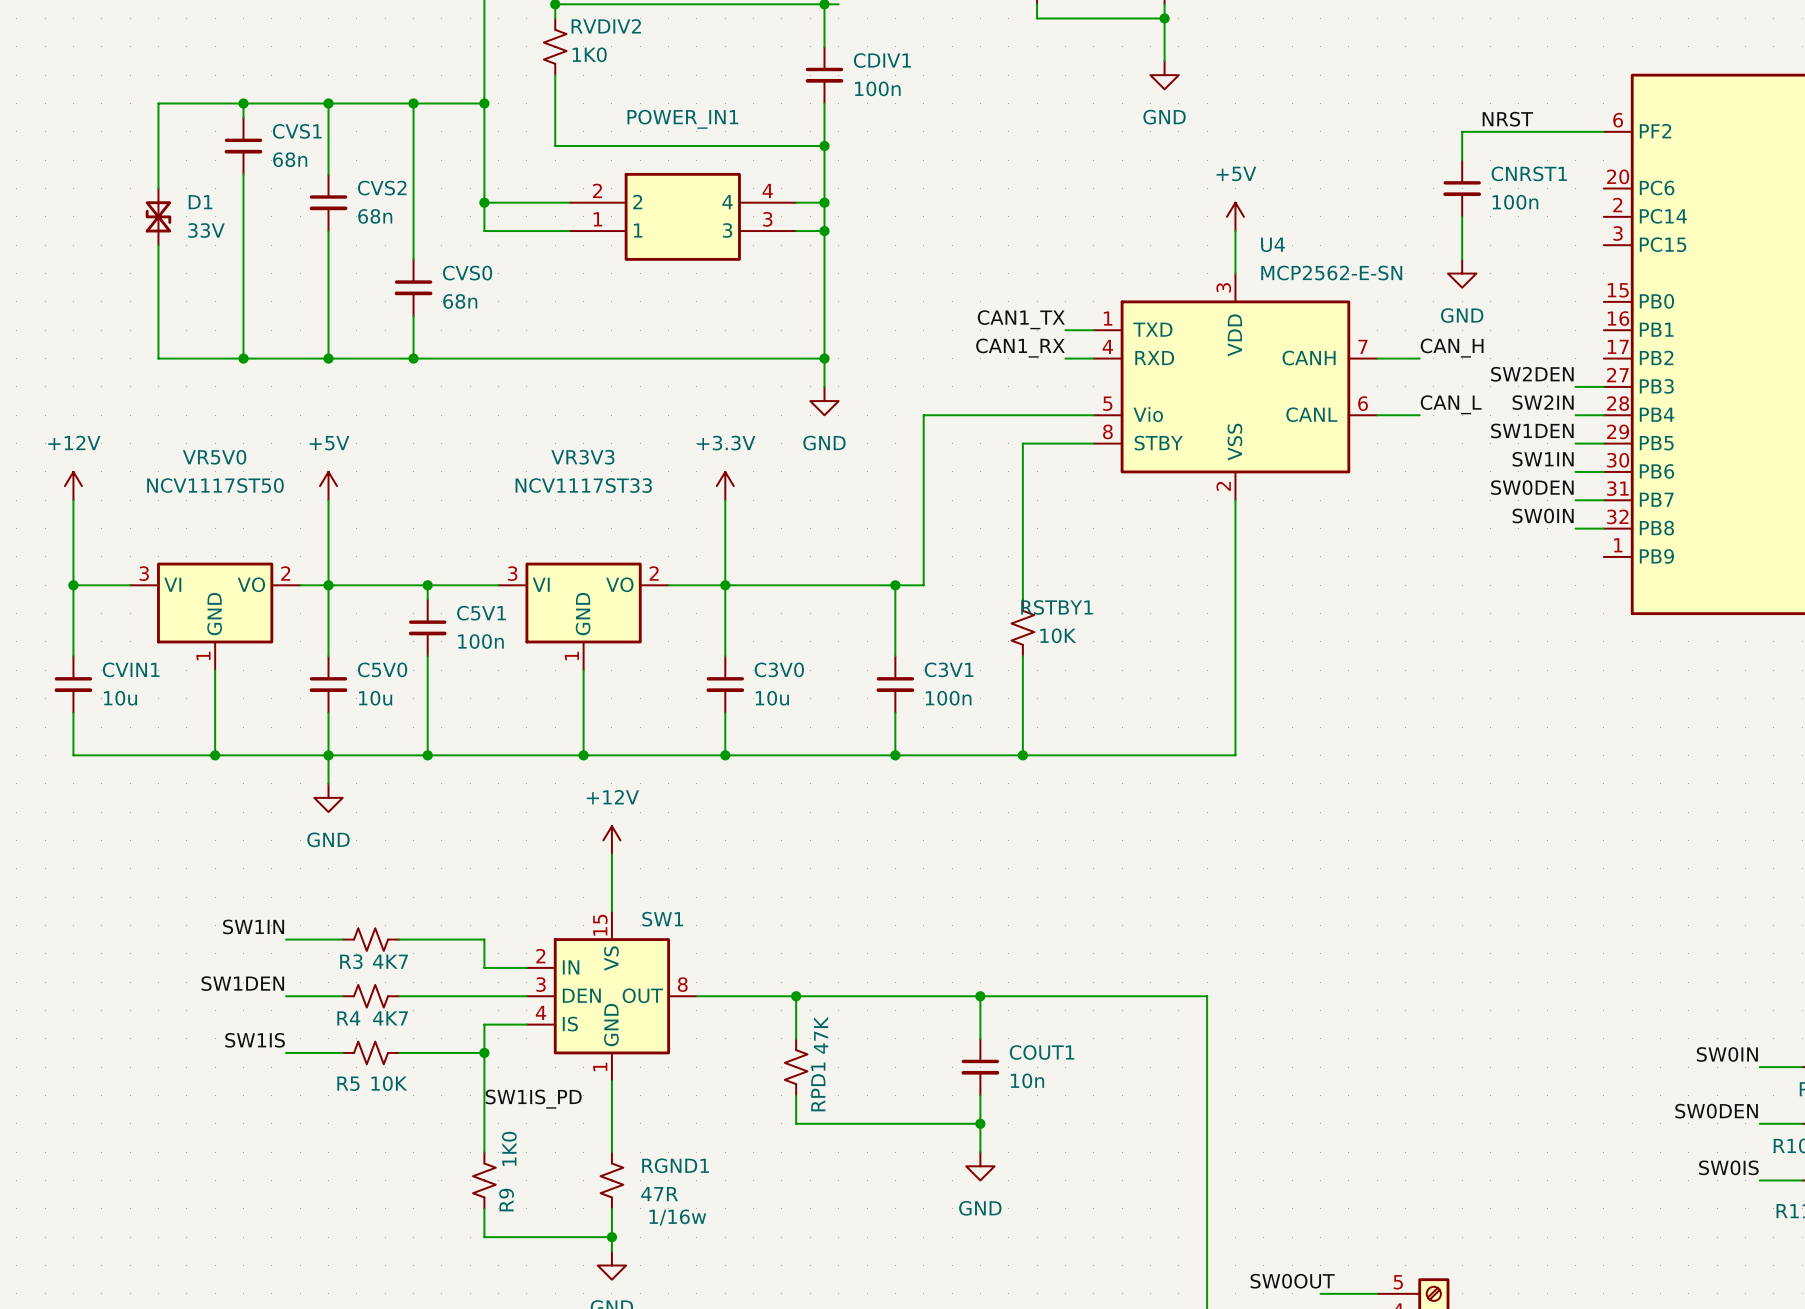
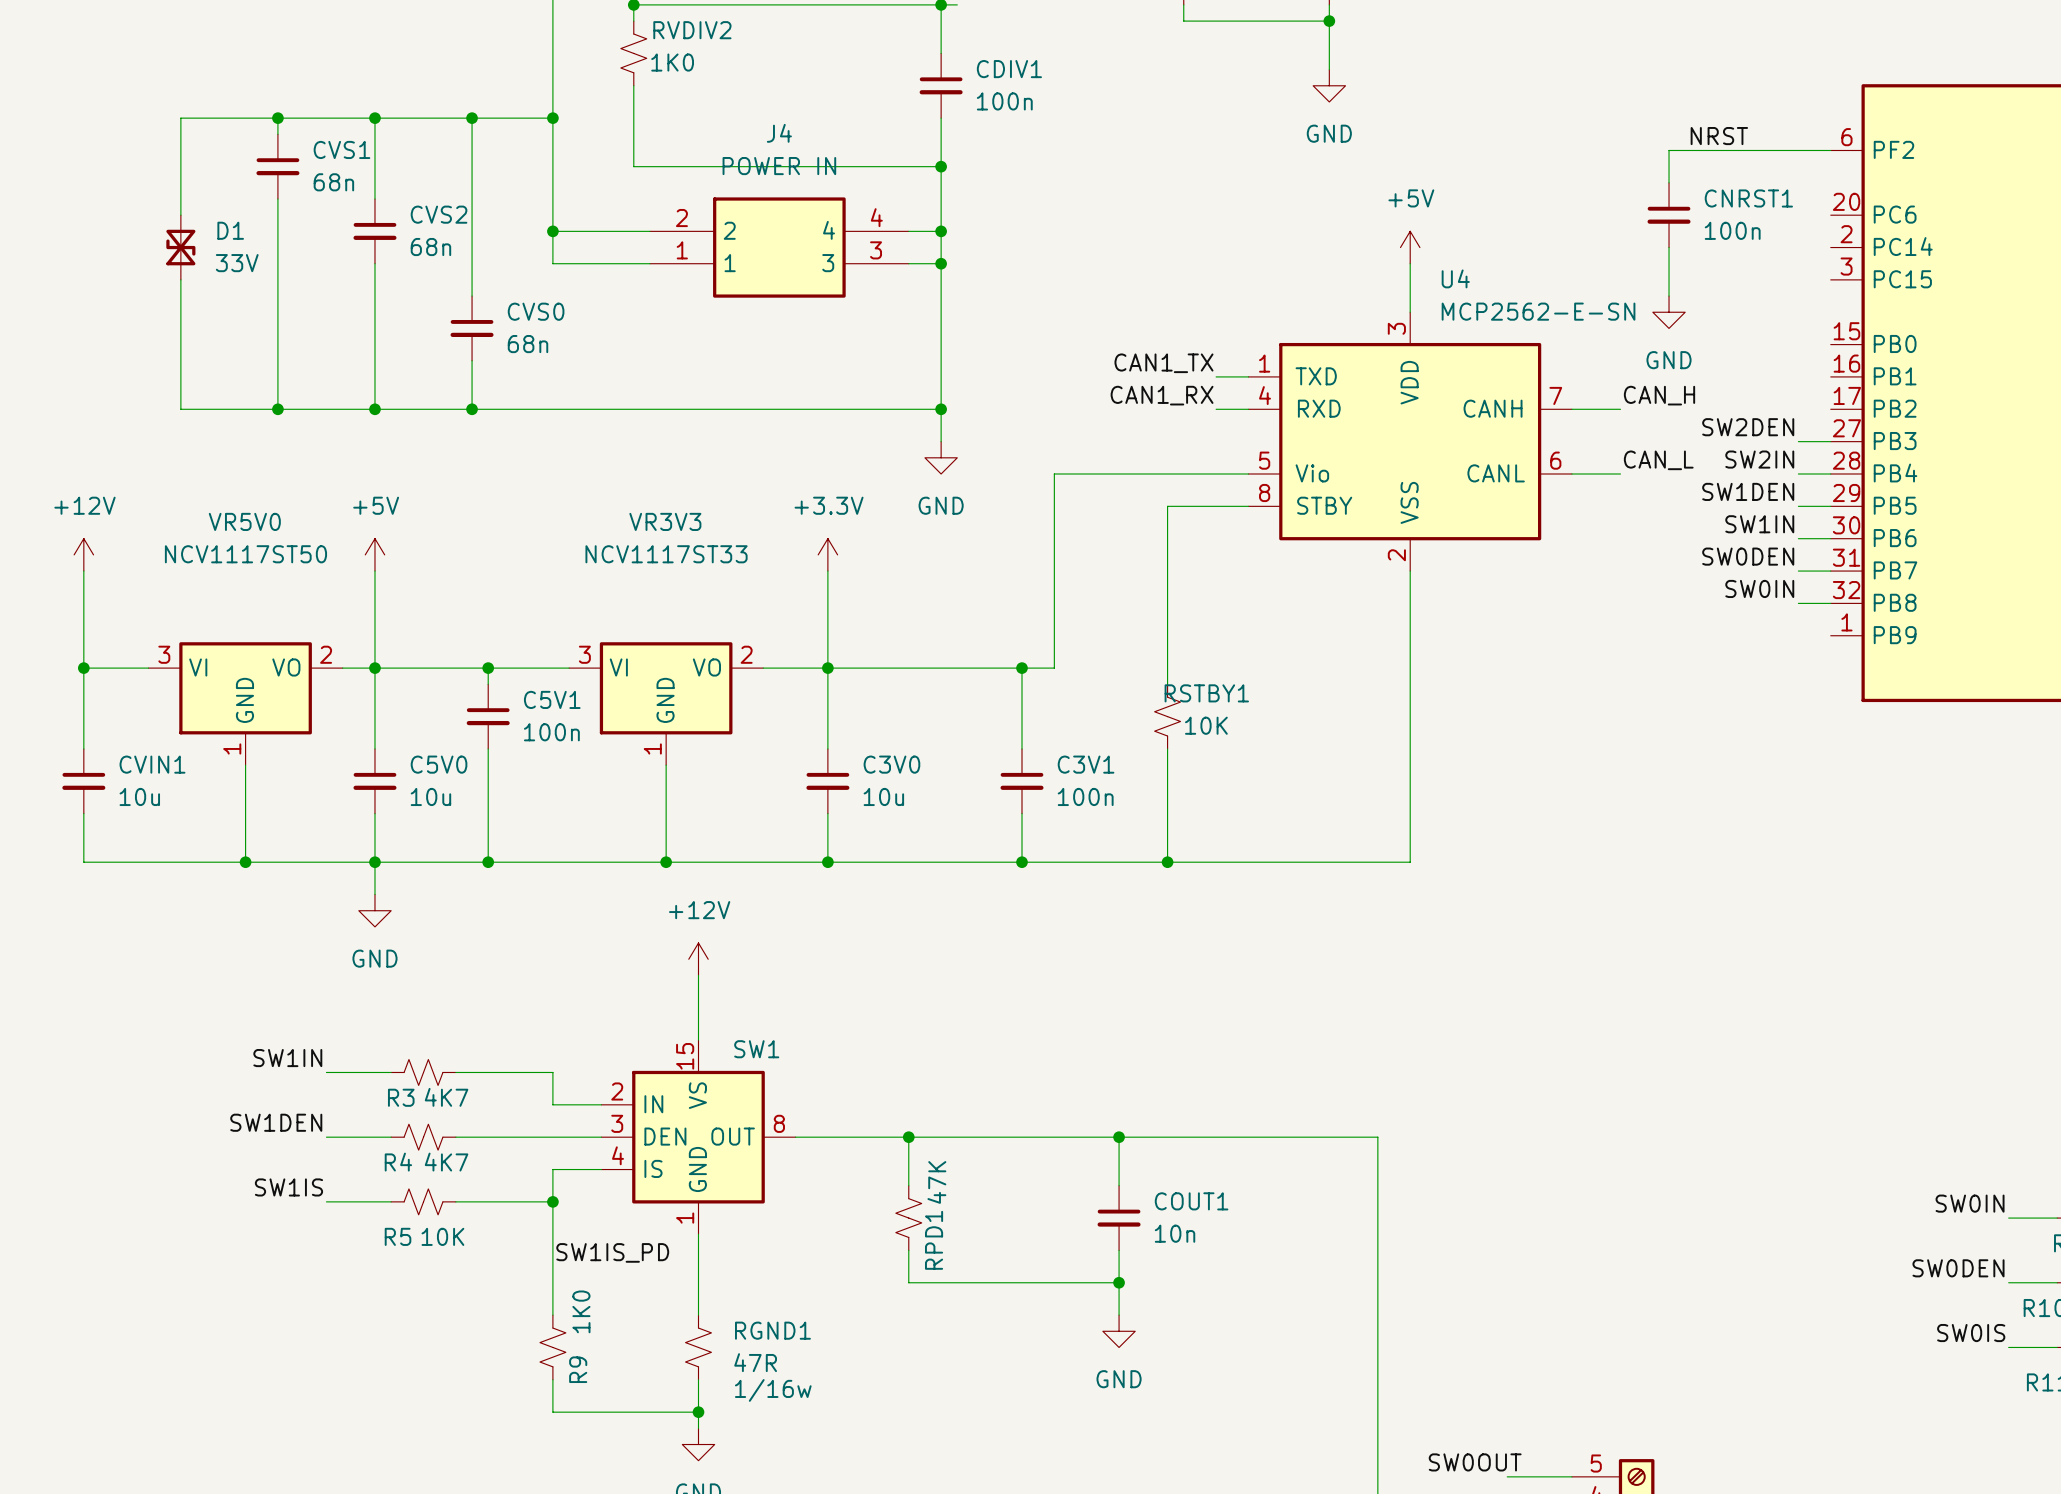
POWER_IN1 name: POWER_IN1 (682, 119) -> J4 (779, 133)
POWER_IN1 value: none -> POWER IN (779, 166)

